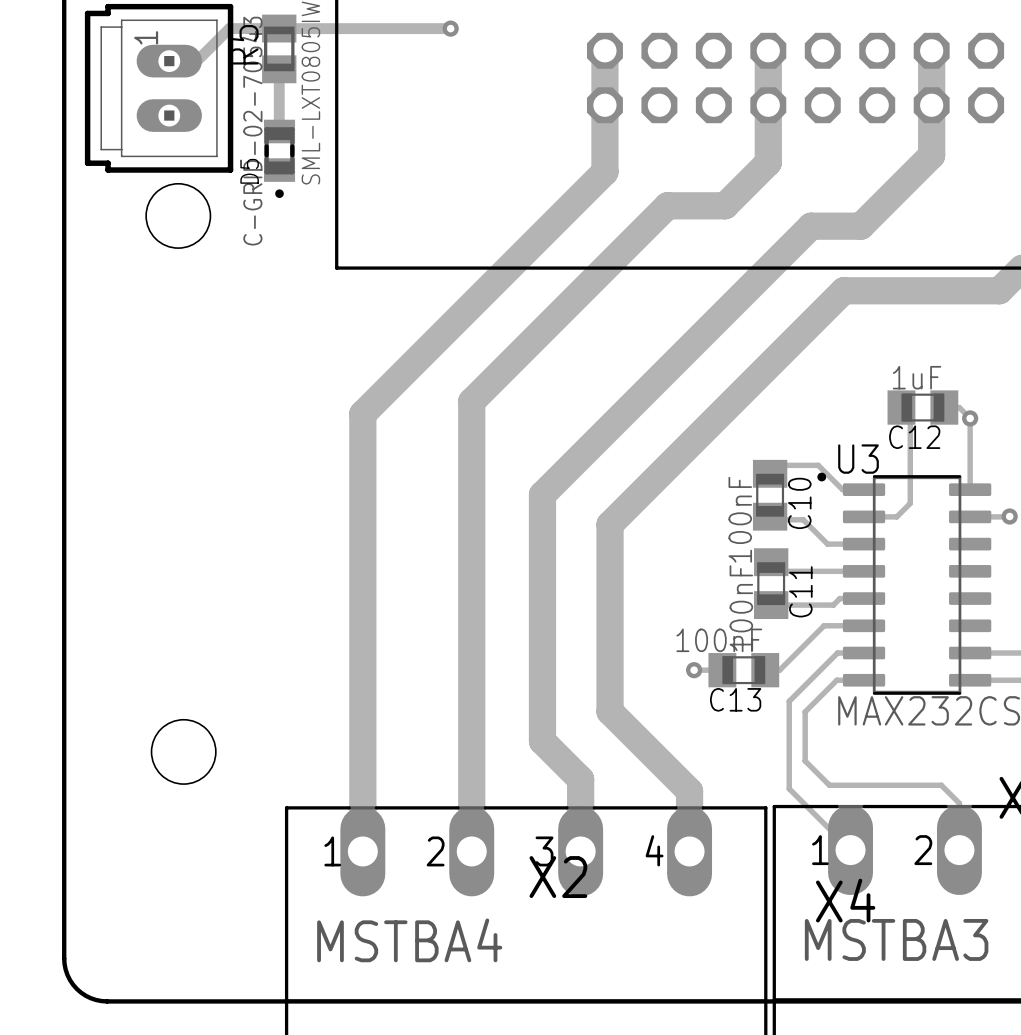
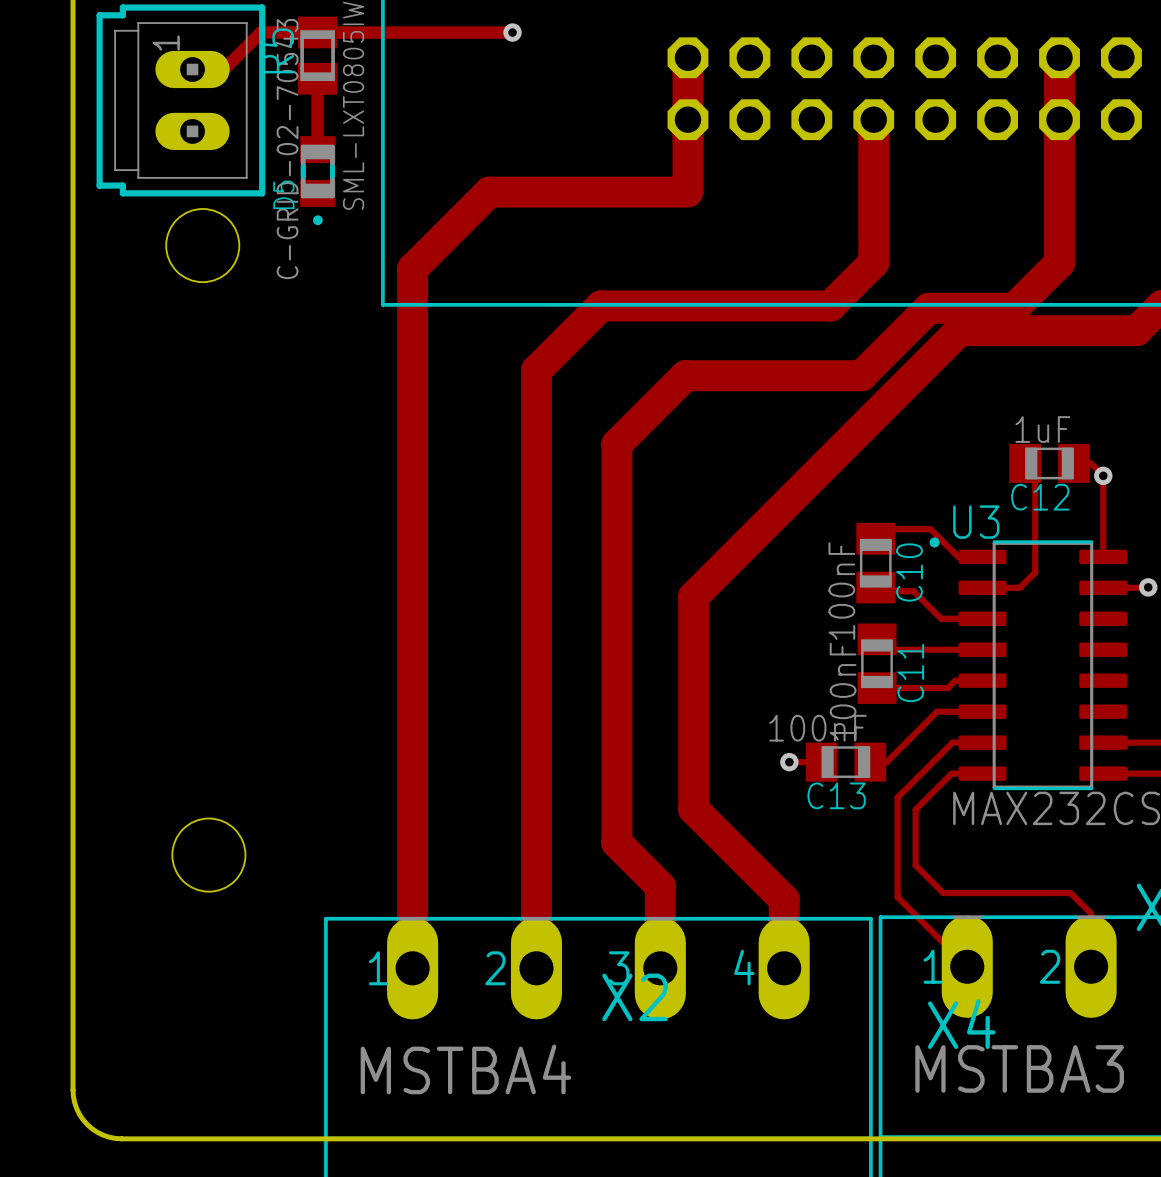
track: (768, 50) (768, 162) (725, 205) (667, 205) (471, 401) -> (873, 130) (873, 262) (830, 306) (600, 306) (536, 370) (536, 456)
track: (931, 155) (860, 226) (811, 226) (542, 494) -> (1059, 176) (1059, 262) (1014, 308) (928, 308) (861, 375) (685, 375) (616, 444) (616, 562)
track: (604, 168) (604, 171) (362, 414) -> (687, 192) (489, 192) (412, 268) (412, 470)

